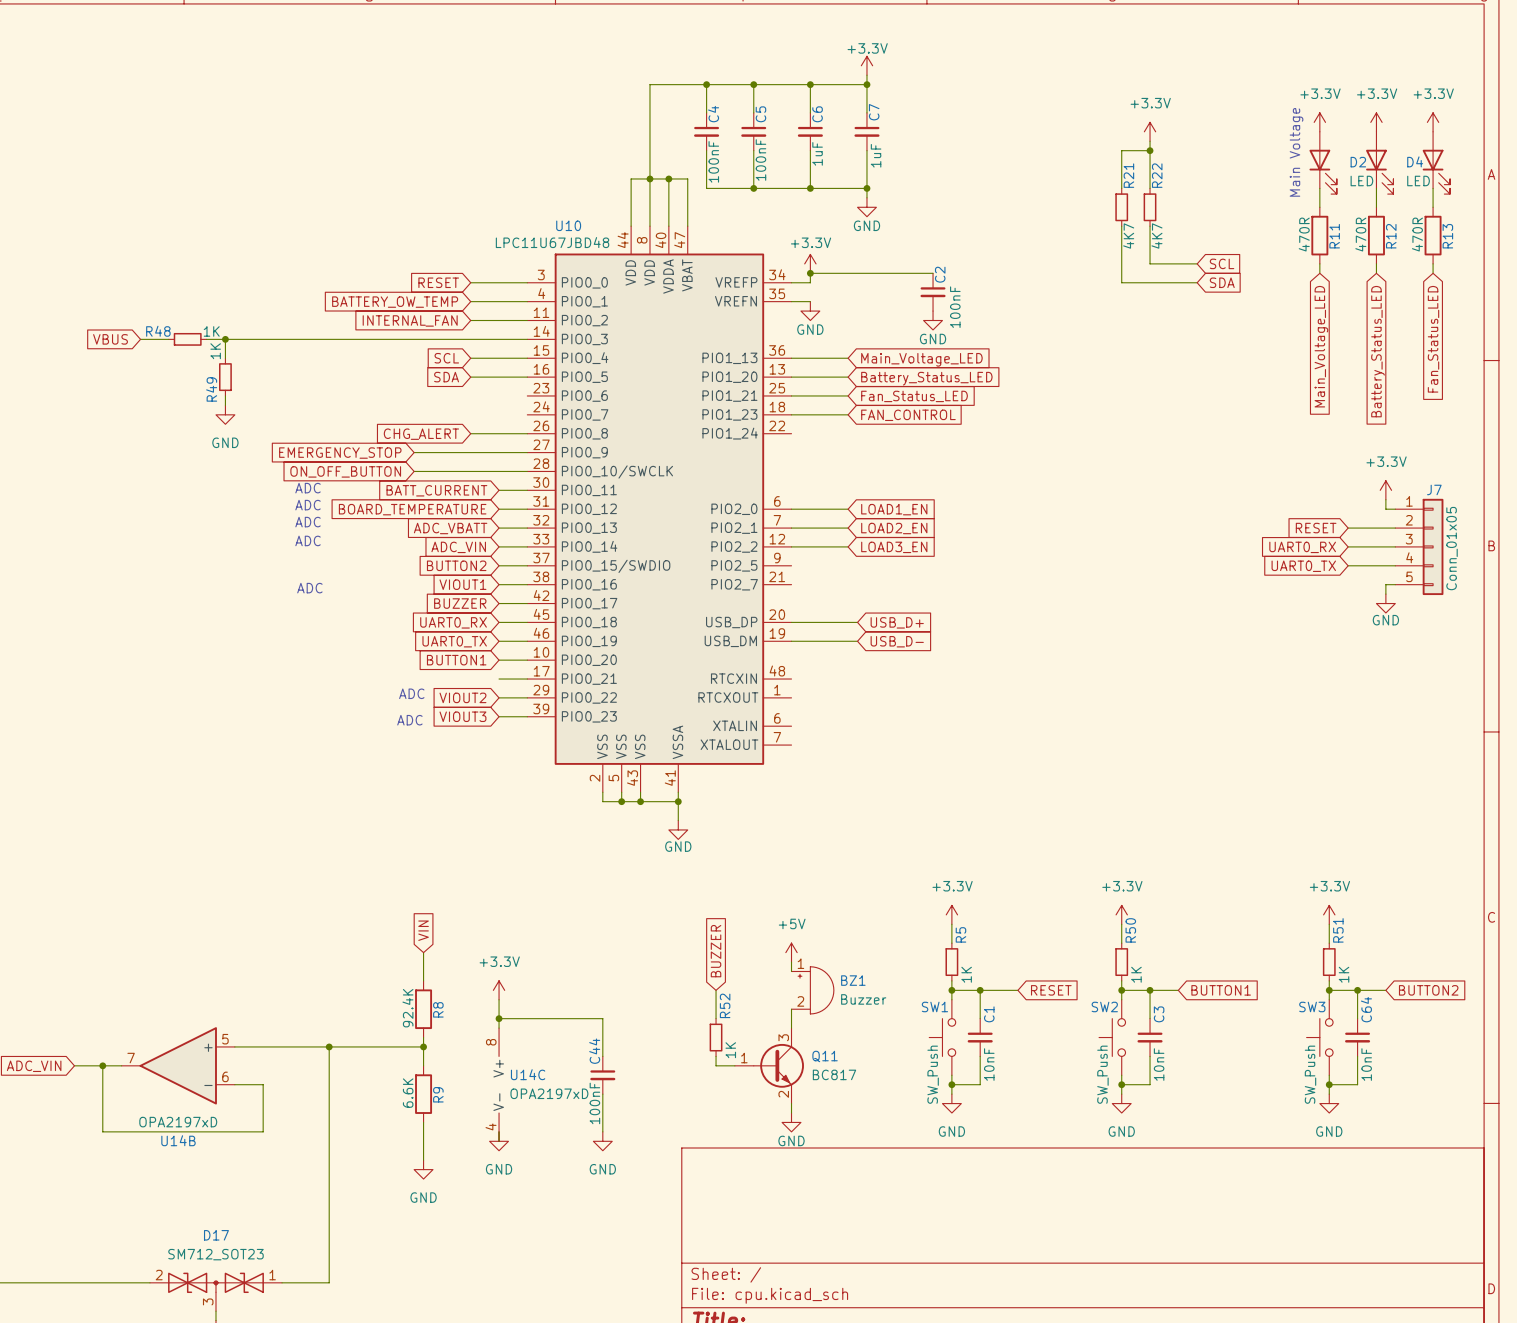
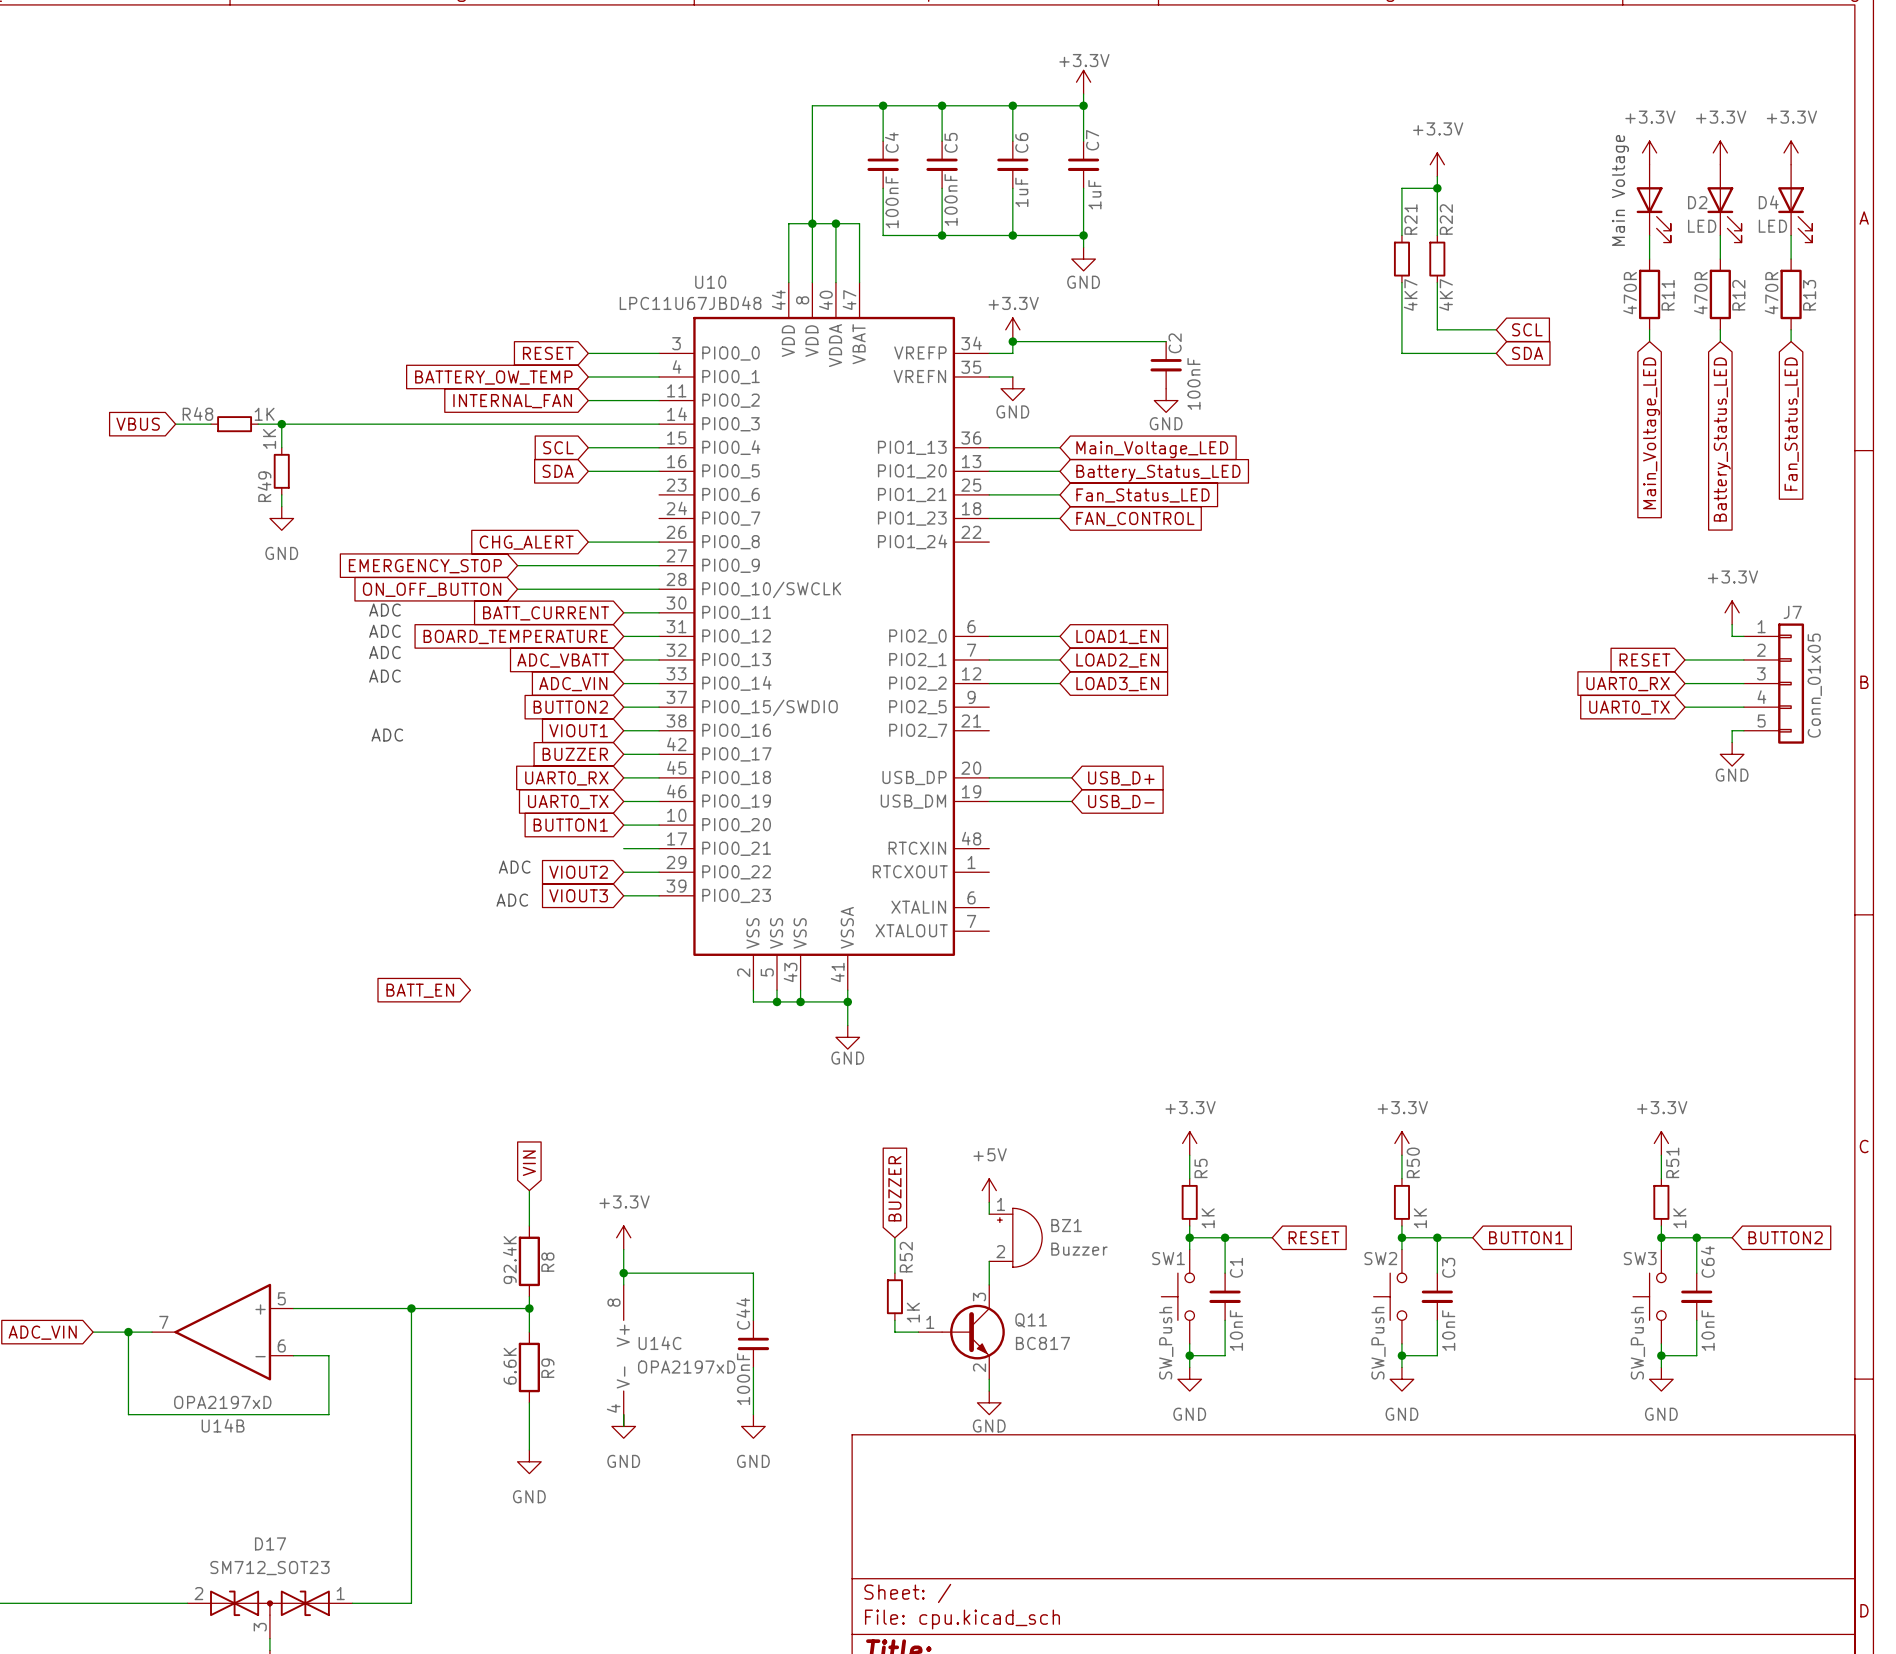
global label: none -> BATT_EN (420, 990)

